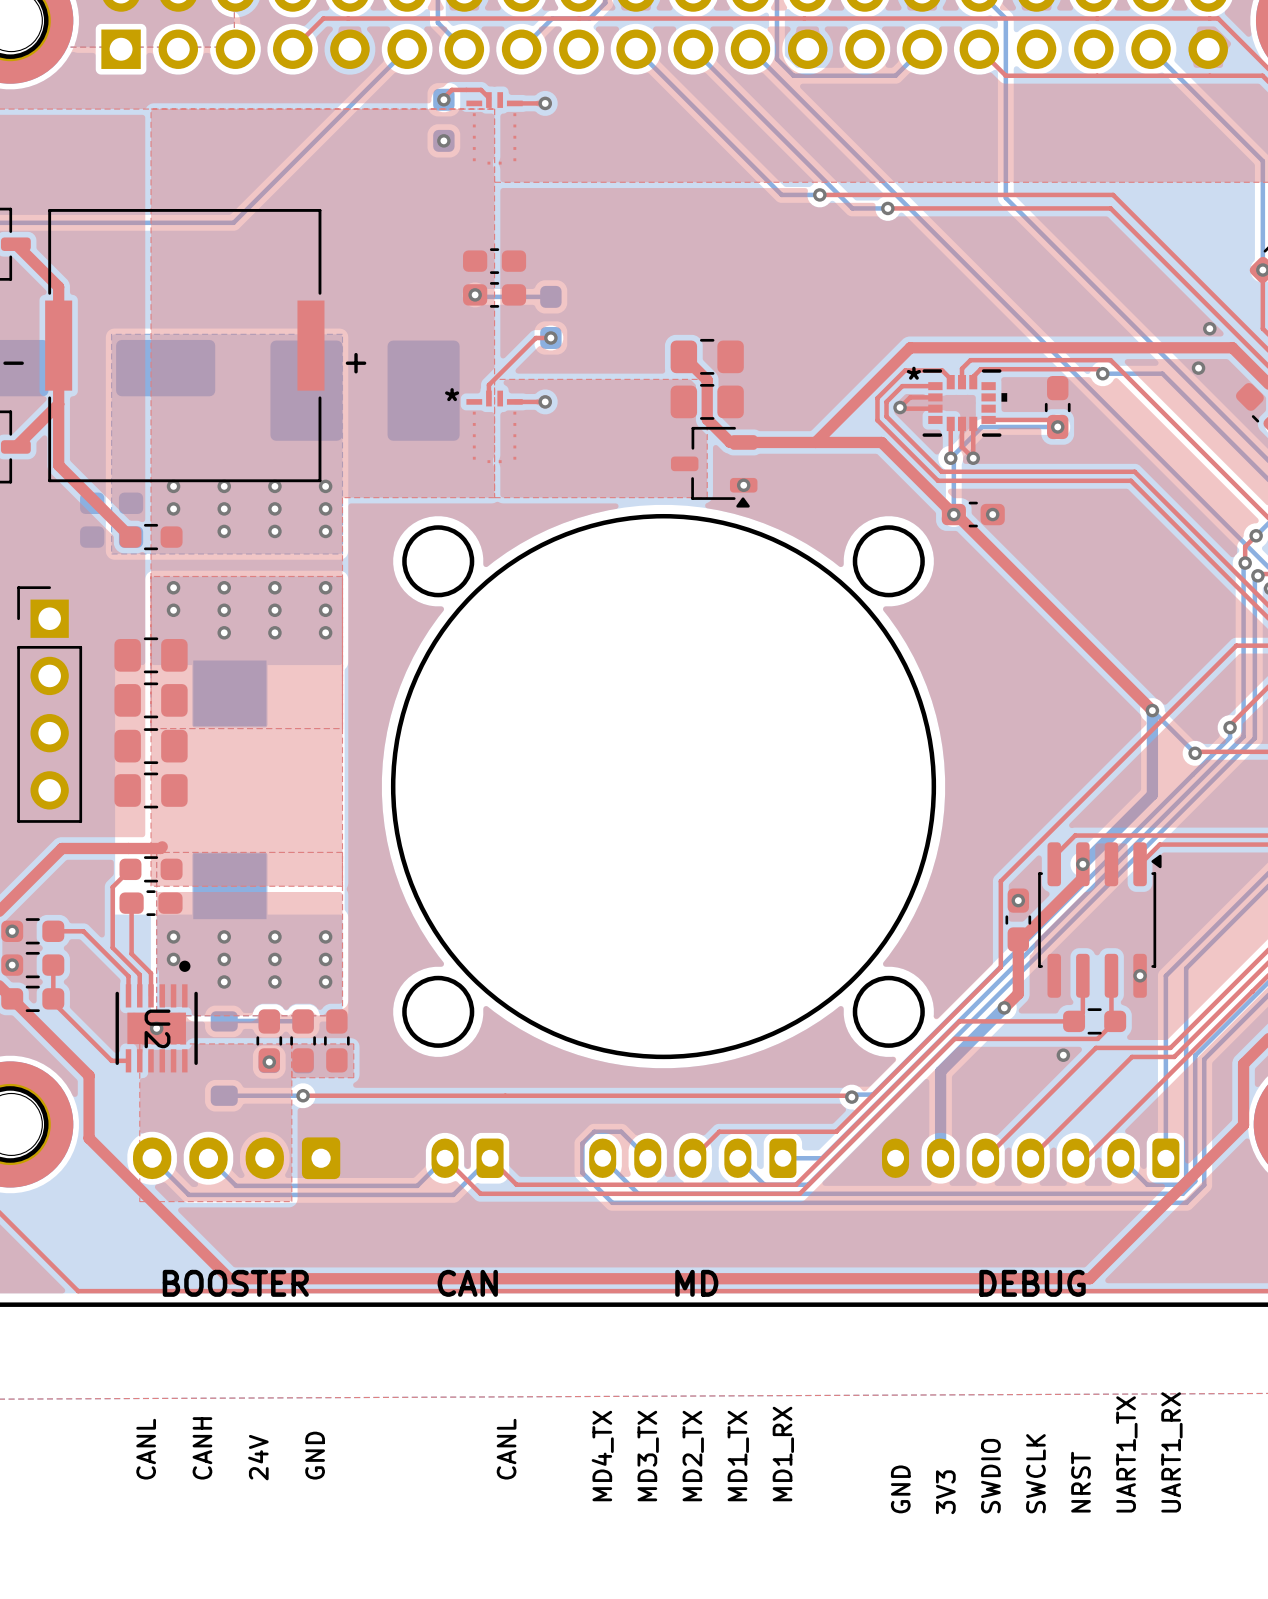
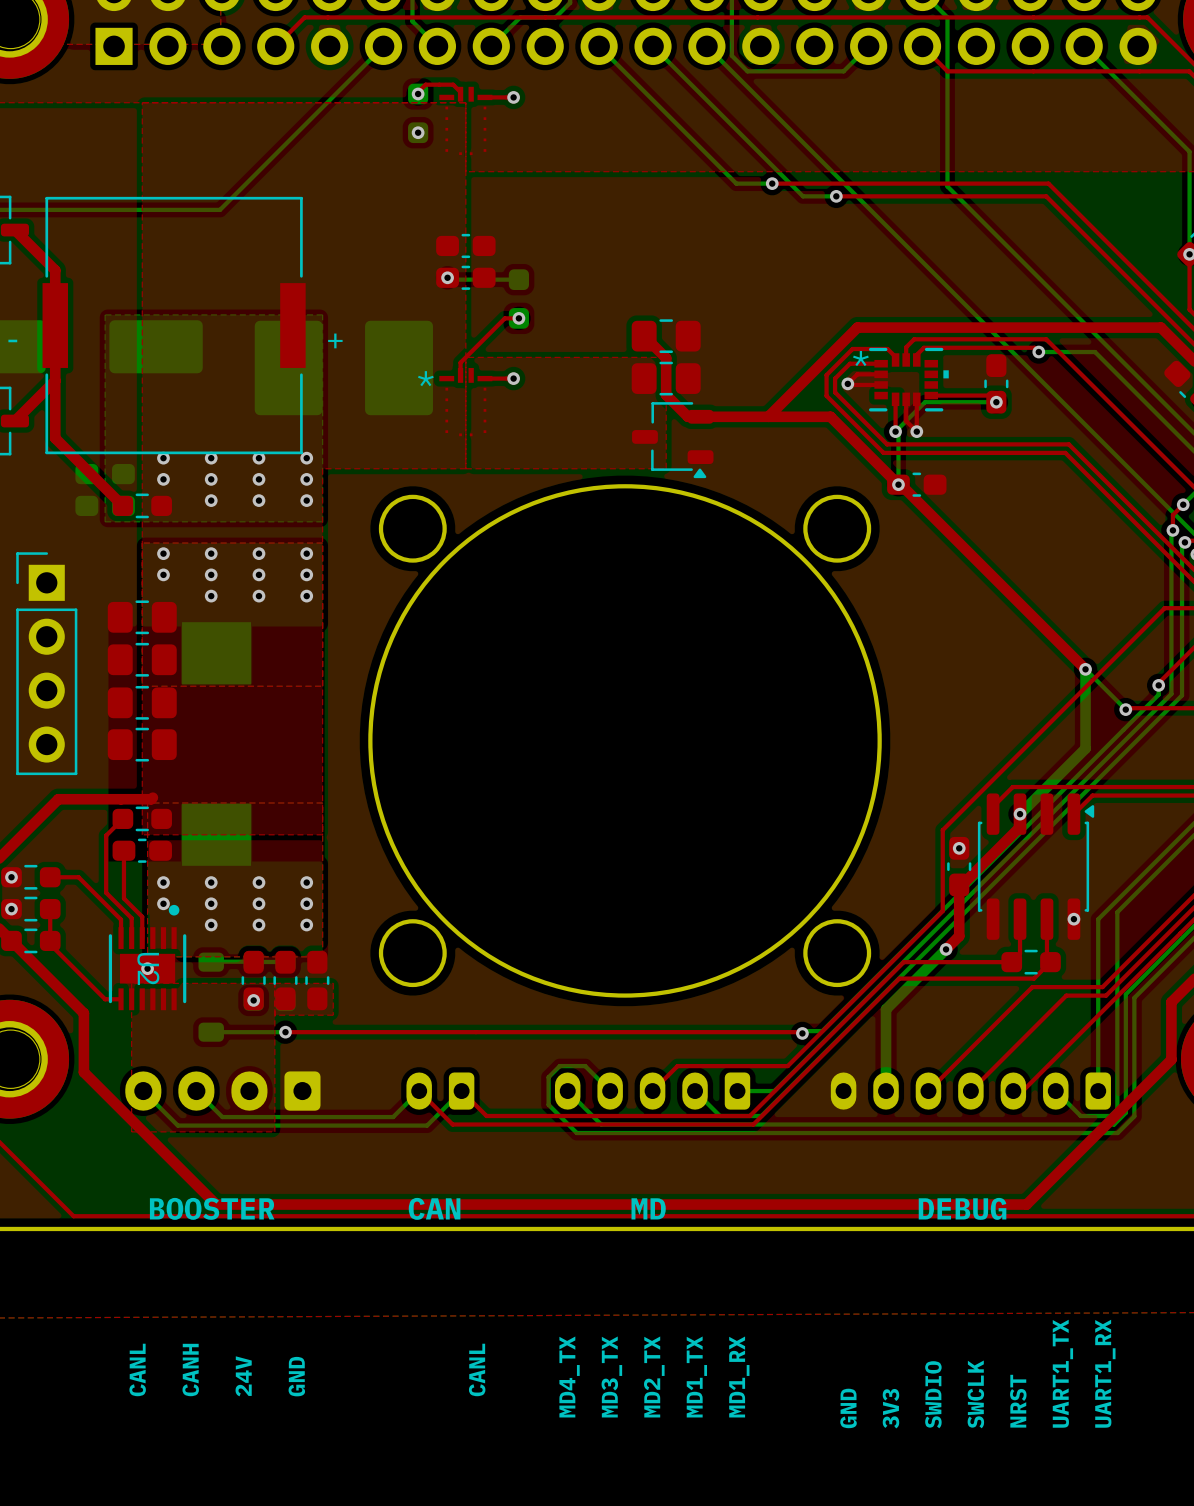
via: (1209, 328) -> none
via: (1198, 368) -> none
via: (743, 485) -> none
via: (992, 514) -> none
via: (1063, 1055) -> none

